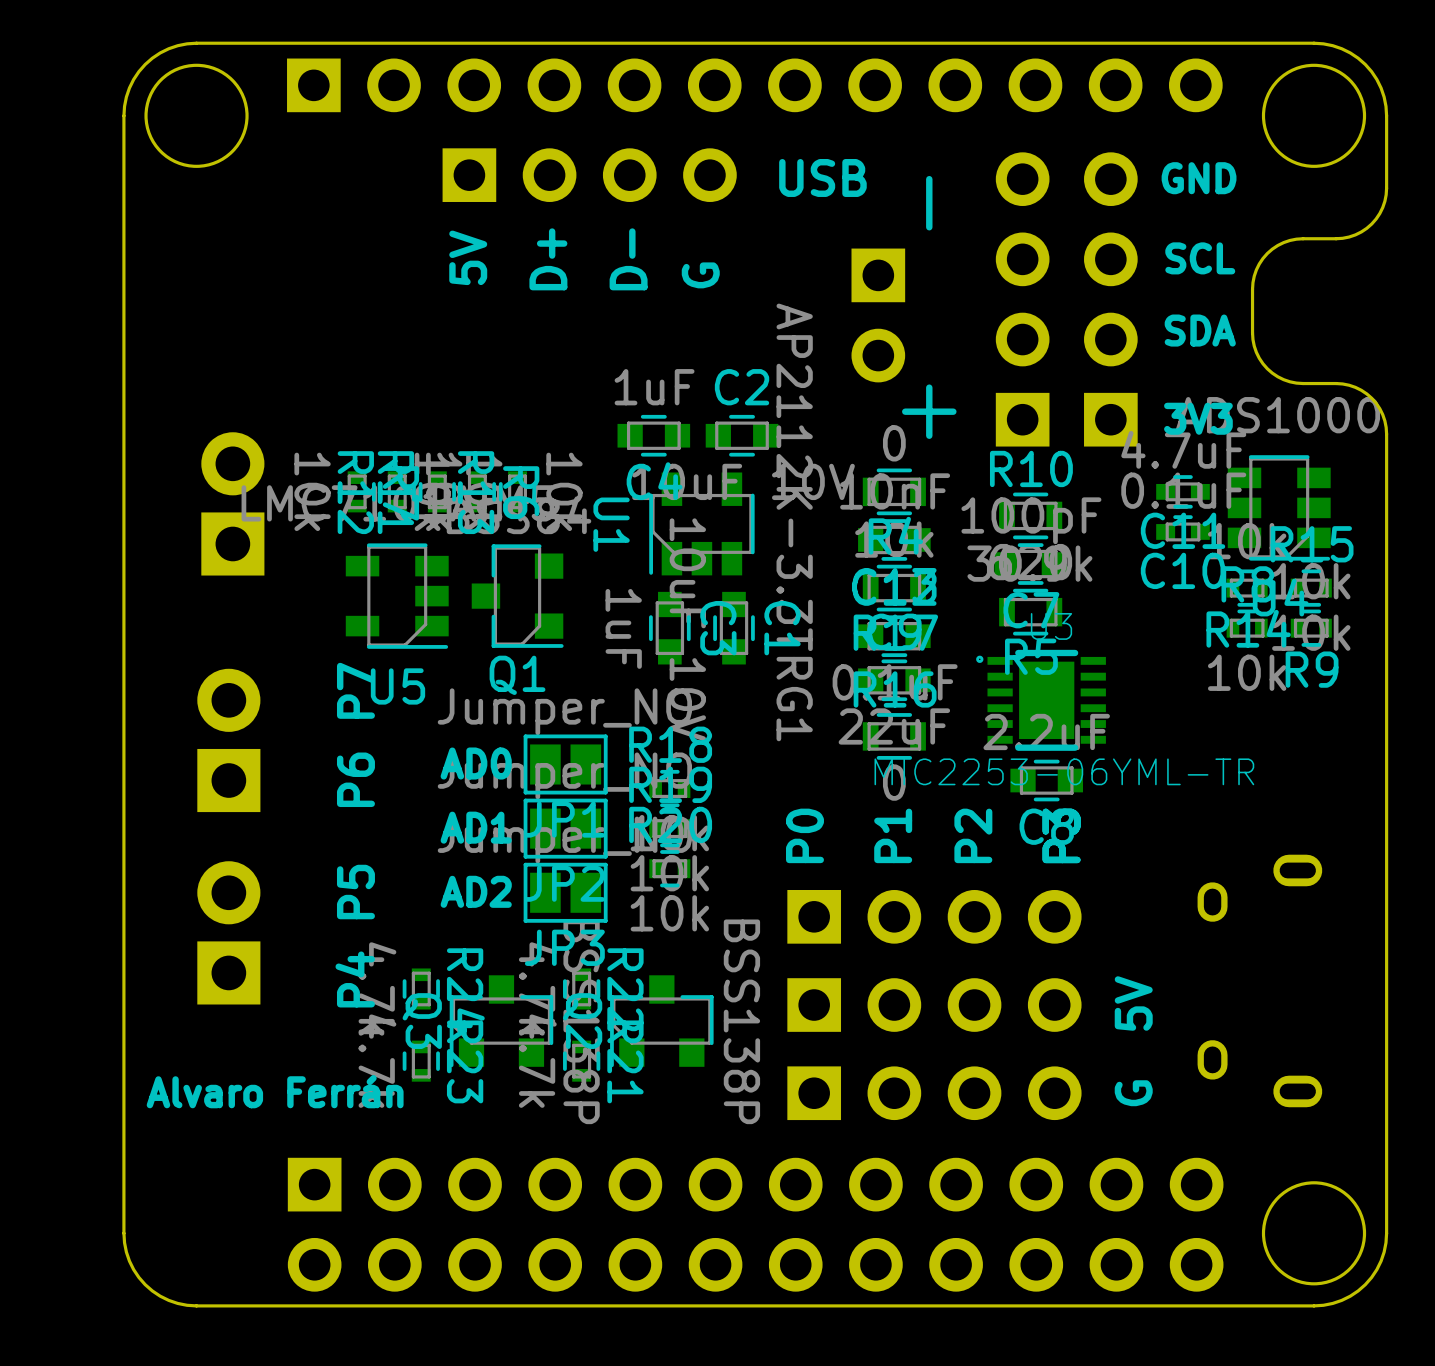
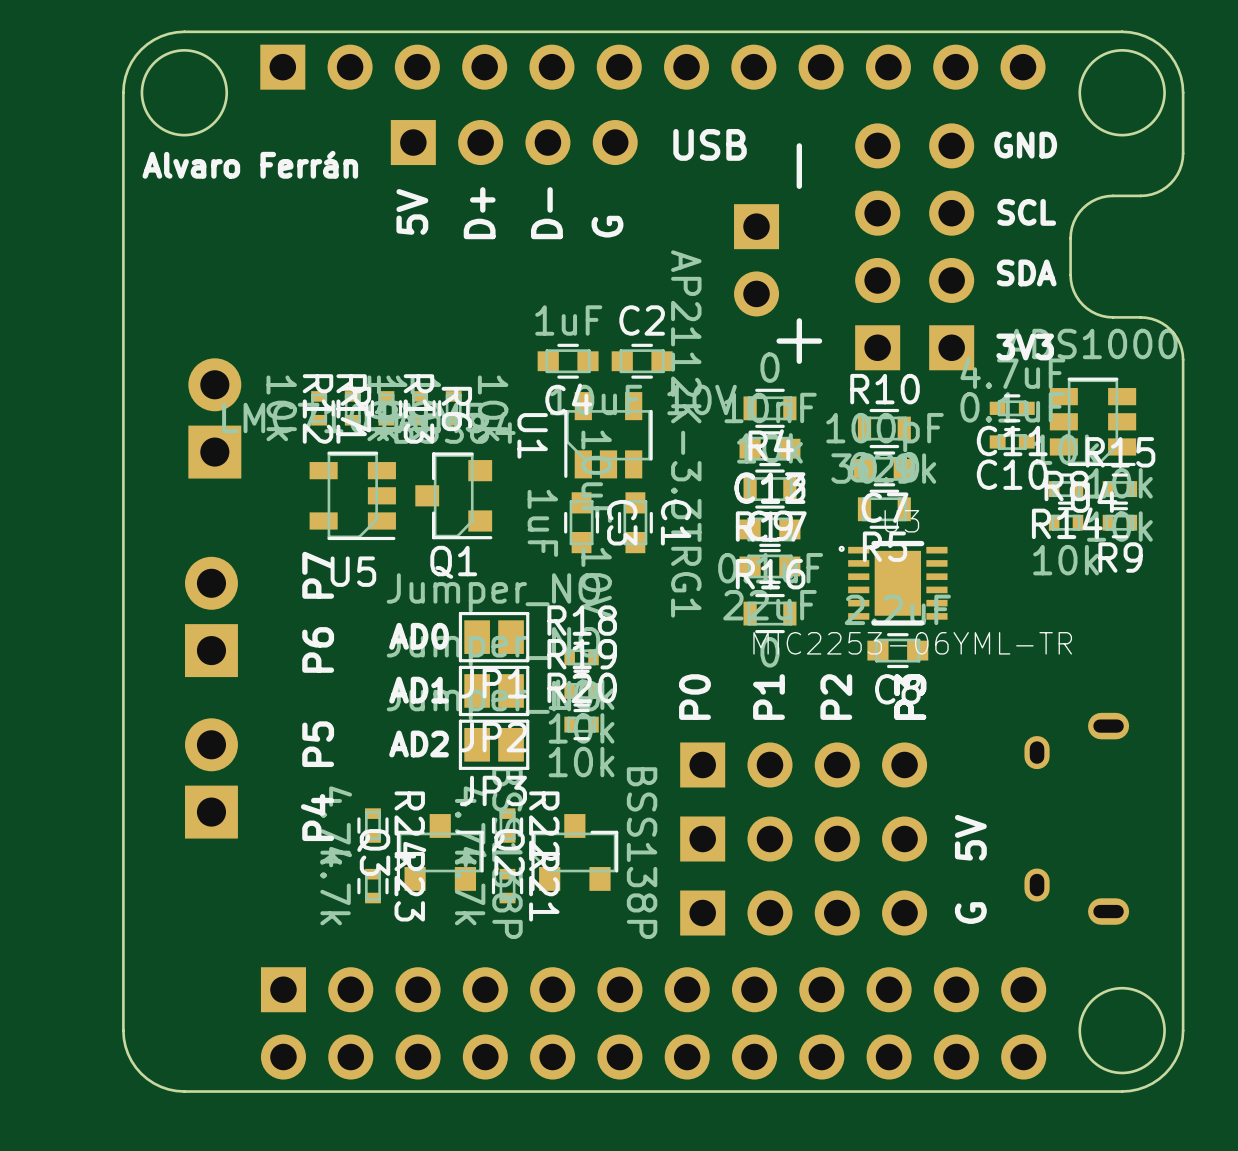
text: none -> Alvaro Ferrán (250, 164)
text: Alvaro Ferrán (275, 1091) -> none

